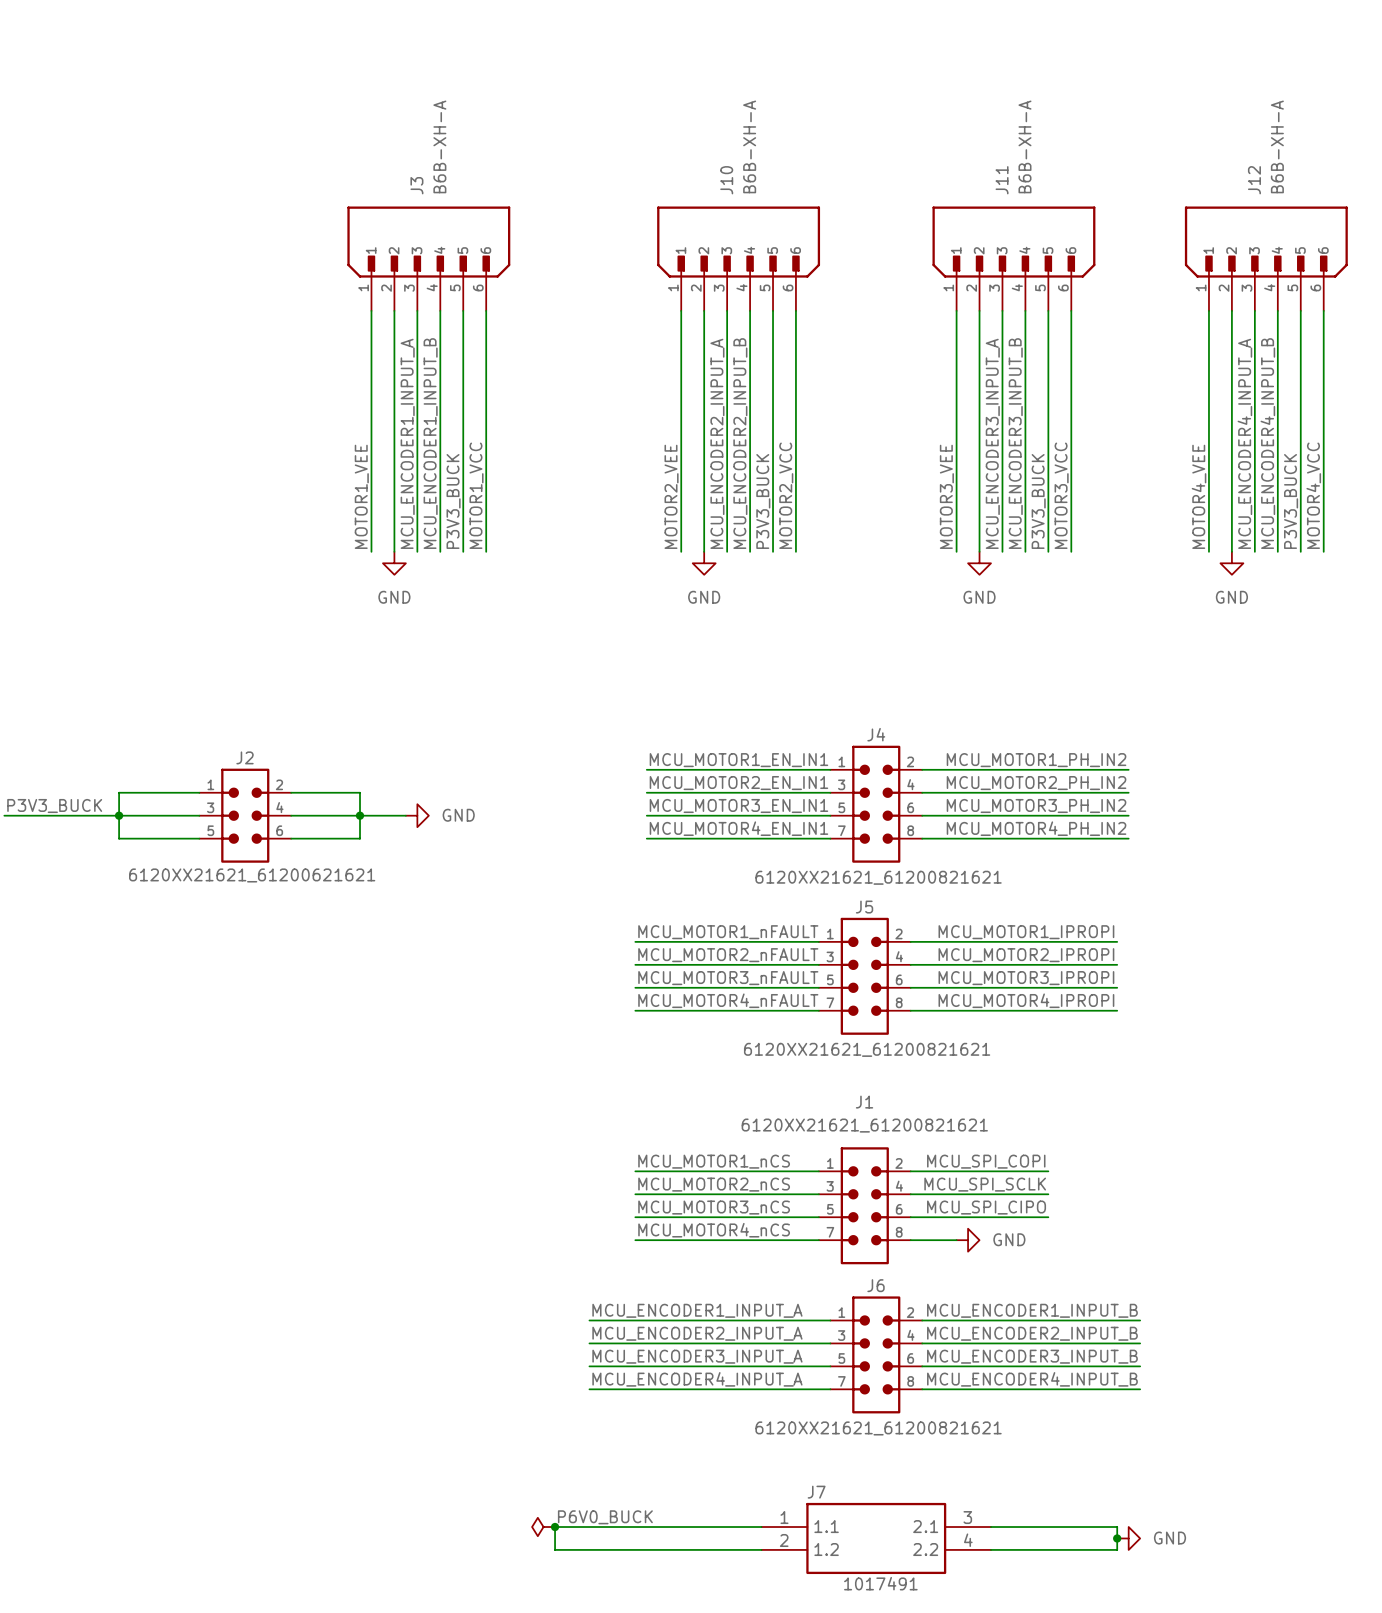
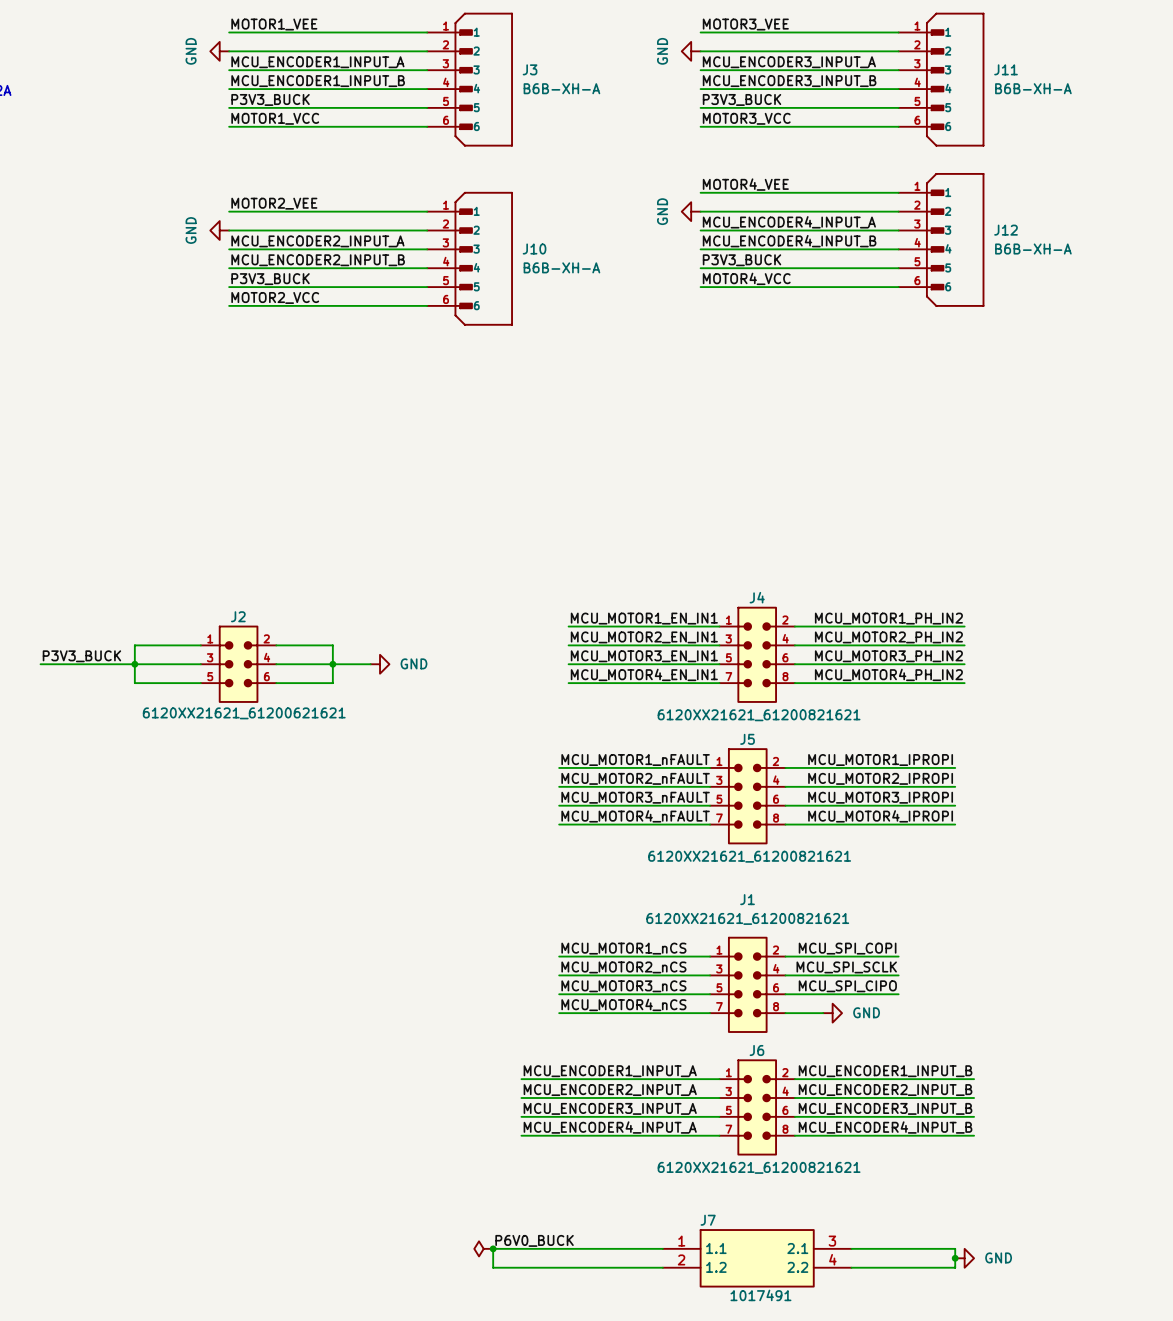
label: none -> MOTOR1_VEE (274, 24)
label: none -> MOTOR3_VEE (745, 24)
wire: none -> (229, 32) (427, 32)
wire: none -> (700, 32) (898, 32)
power symbol: none -> GND (219, 51)
wire: none -> (229, 51) (427, 51)
power symbol: none -> GND (691, 51)
wire: none -> (700, 51) (898, 51)
label: none -> MCU_ENCODER1_INPUT_A (317, 62)
label: none -> MCU_ENCODER3_INPUT_A (789, 62)
wire: none -> (229, 70) (427, 70)
wire: none -> (700, 70) (898, 70)
label: none -> MCU_ENCODER1_INPUT_B (318, 81)
label: none -> MCU_ENCODER3_INPUT_B (789, 81)
wire: none -> (229, 89) (427, 89)
wire: none -> (700, 89) (898, 89)
label: none -> P3V3_BUCK (270, 99)
label: none -> P3V3_BUCK (741, 99)
wire: none -> (229, 107) (427, 107)
wire: none -> (700, 107) (898, 107)
label: none -> MOTOR1_VCC (275, 118)
label: none -> MOTOR3_VCC (746, 118)
wire: none -> (229, 126) (427, 126)
wire: none -> (700, 126) (898, 126)
label: none -> MOTOR4_VEE (745, 184)
J3 rotation: 0° (428, 242) -> 90° clockwise (483, 79)
J10 rotation: 0° (738, 242) -> 90° clockwise (483, 258)
wire: none -> (700, 192) (898, 192)
J11 rotation: 0° (1013, 242) -> 90° clockwise (955, 79)
J12 rotation: 0° (1266, 242) -> 90° clockwise (955, 239)
label: none -> MOTOR2_VEE (274, 203)
J3 position: (428, 258) -> (470, 79)
J10 position: (738, 258) -> (470, 258)
J11 position: (1013, 258) -> (941, 79)
J12 position: (1266, 258) -> (941, 239)
wire: none -> (229, 211) (427, 211)
power symbol: none -> GND (691, 211)
wire: none -> (700, 211) (898, 211)
label: none -> MCU_ENCODER4_INPUT_A (789, 222)
power symbol: none -> GND (219, 230)
wire: none -> (229, 230) (427, 230)
wire: none -> (700, 230) (898, 230)
label: none -> MCU_ENCODER4_INPUT_B (789, 241)
label: none -> MCU_ENCODER2_INPUT_A (317, 241)
wire: none -> (229, 249) (427, 249)
wire: (371, 310) (371, 551) -> none
wire: (394, 310) (394, 551) -> none
wire: (417, 310) (417, 551) -> none
wire: (440, 310) (440, 551) -> none
wire: (463, 310) (463, 551) -> none
wire: (486, 310) (486, 551) -> none
wire: (681, 310) (681, 551) -> none
wire: (704, 310) (704, 551) -> none
wire: (727, 310) (727, 551) -> none
wire: (750, 310) (750, 551) -> none
wire: (773, 310) (773, 551) -> none
wire: (795, 310) (795, 551) -> none
wire: (956, 310) (956, 551) -> none
wire: (979, 310) (979, 551) -> none
wire: (1002, 310) (1002, 551) -> none
wire: (1025, 310) (1025, 551) -> none
wire: (1048, 310) (1048, 551) -> (898, 249) (700, 249)
wire: (1071, 310) (1071, 551) -> none
wire: (1208, 310) (1208, 551) -> none
wire: (1231, 310) (1231, 551) -> none
wire: (1254, 310) (1254, 551) -> none
wire: (1277, 310) (1277, 551) -> none
wire: (1300, 310) (1300, 551) -> none
wire: (1323, 310) (1323, 551) -> none
label: none -> MCU_ENCODER2_INPUT_B (318, 260)
label: none -> P3V3_BUCK (741, 260)
wire: none -> (229, 268) (427, 268)
wire: none -> (700, 268) (898, 268)
label: none -> MOTOR4_VCC (746, 278)
label: none -> P3V3_BUCK (270, 279)
wire: none -> (229, 287) (427, 287)
wire: none -> (700, 287) (898, 287)
label: none -> MOTOR2_VCC (275, 297)
wire: none -> (229, 305) (427, 305)
label: MCU_ENCODER1_INPUT_A (407, 443) -> none
label: MCU_ENCODER1_INPUT_B (430, 443) -> none
label: MCU_ENCODER2_INPUT_A (717, 443) -> none
label: MCU_ENCODER2_INPUT_B (740, 443) -> none
label: MCU_ENCODER3_INPUT_A (992, 443) -> none
label: MCU_ENCODER3_INPUT_B (1015, 443) -> none
label: MCU_ENCODER4_INPUT_A (1244, 443) -> none
label: MCU_ENCODER4_INPUT_B (1267, 443) -> none
label: MOTOR1_VCC (476, 495) -> none
label: MOTOR2_VCC (786, 495) -> none
label: MOTOR3_VCC (1061, 495) -> none
label: MOTOR4_VCC (1313, 495) -> none
label: MOTOR1_VEE (361, 496) -> none
label: MOTOR2_VEE (671, 496) -> none
label: MOTOR3_VEE (946, 496) -> none
label: MOTOR4_VEE (1199, 496) -> none
label: P3V3_BUCK (453, 501) -> none
label: P3V3_BUCK (763, 501) -> none
label: P3V3_BUCK (1038, 501) -> none
label: P3V3_BUCK (1291, 501) -> none
power symbol: GND (394, 563) -> none
power symbol: GND (704, 563) -> none
power symbol: GND (979, 563) -> none
power symbol: GND (1231, 563) -> none

